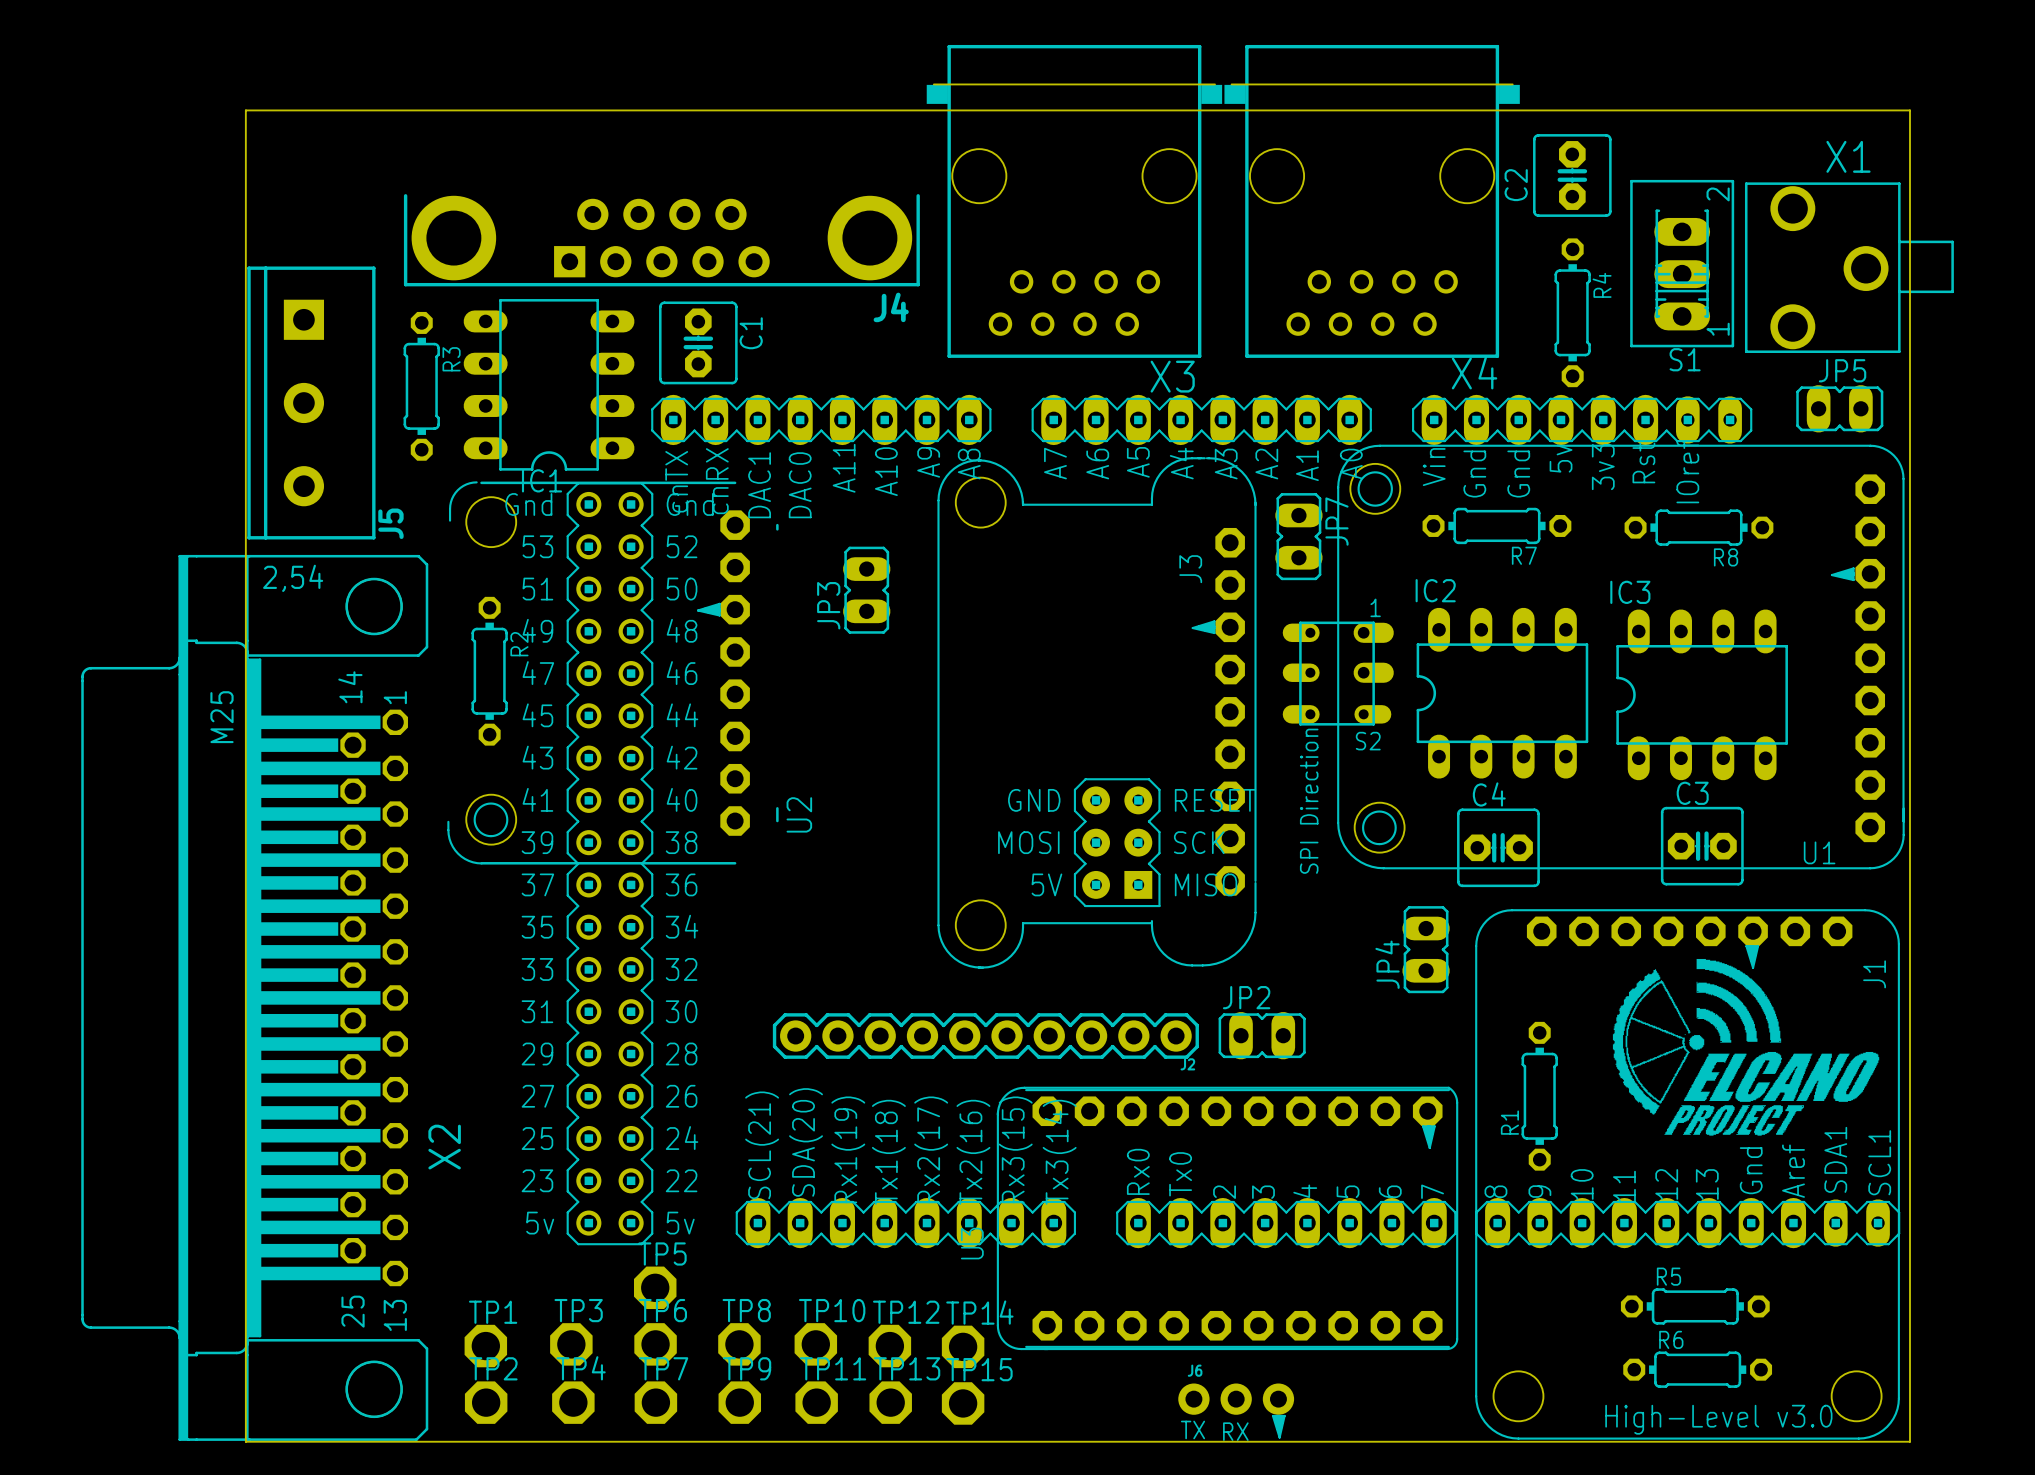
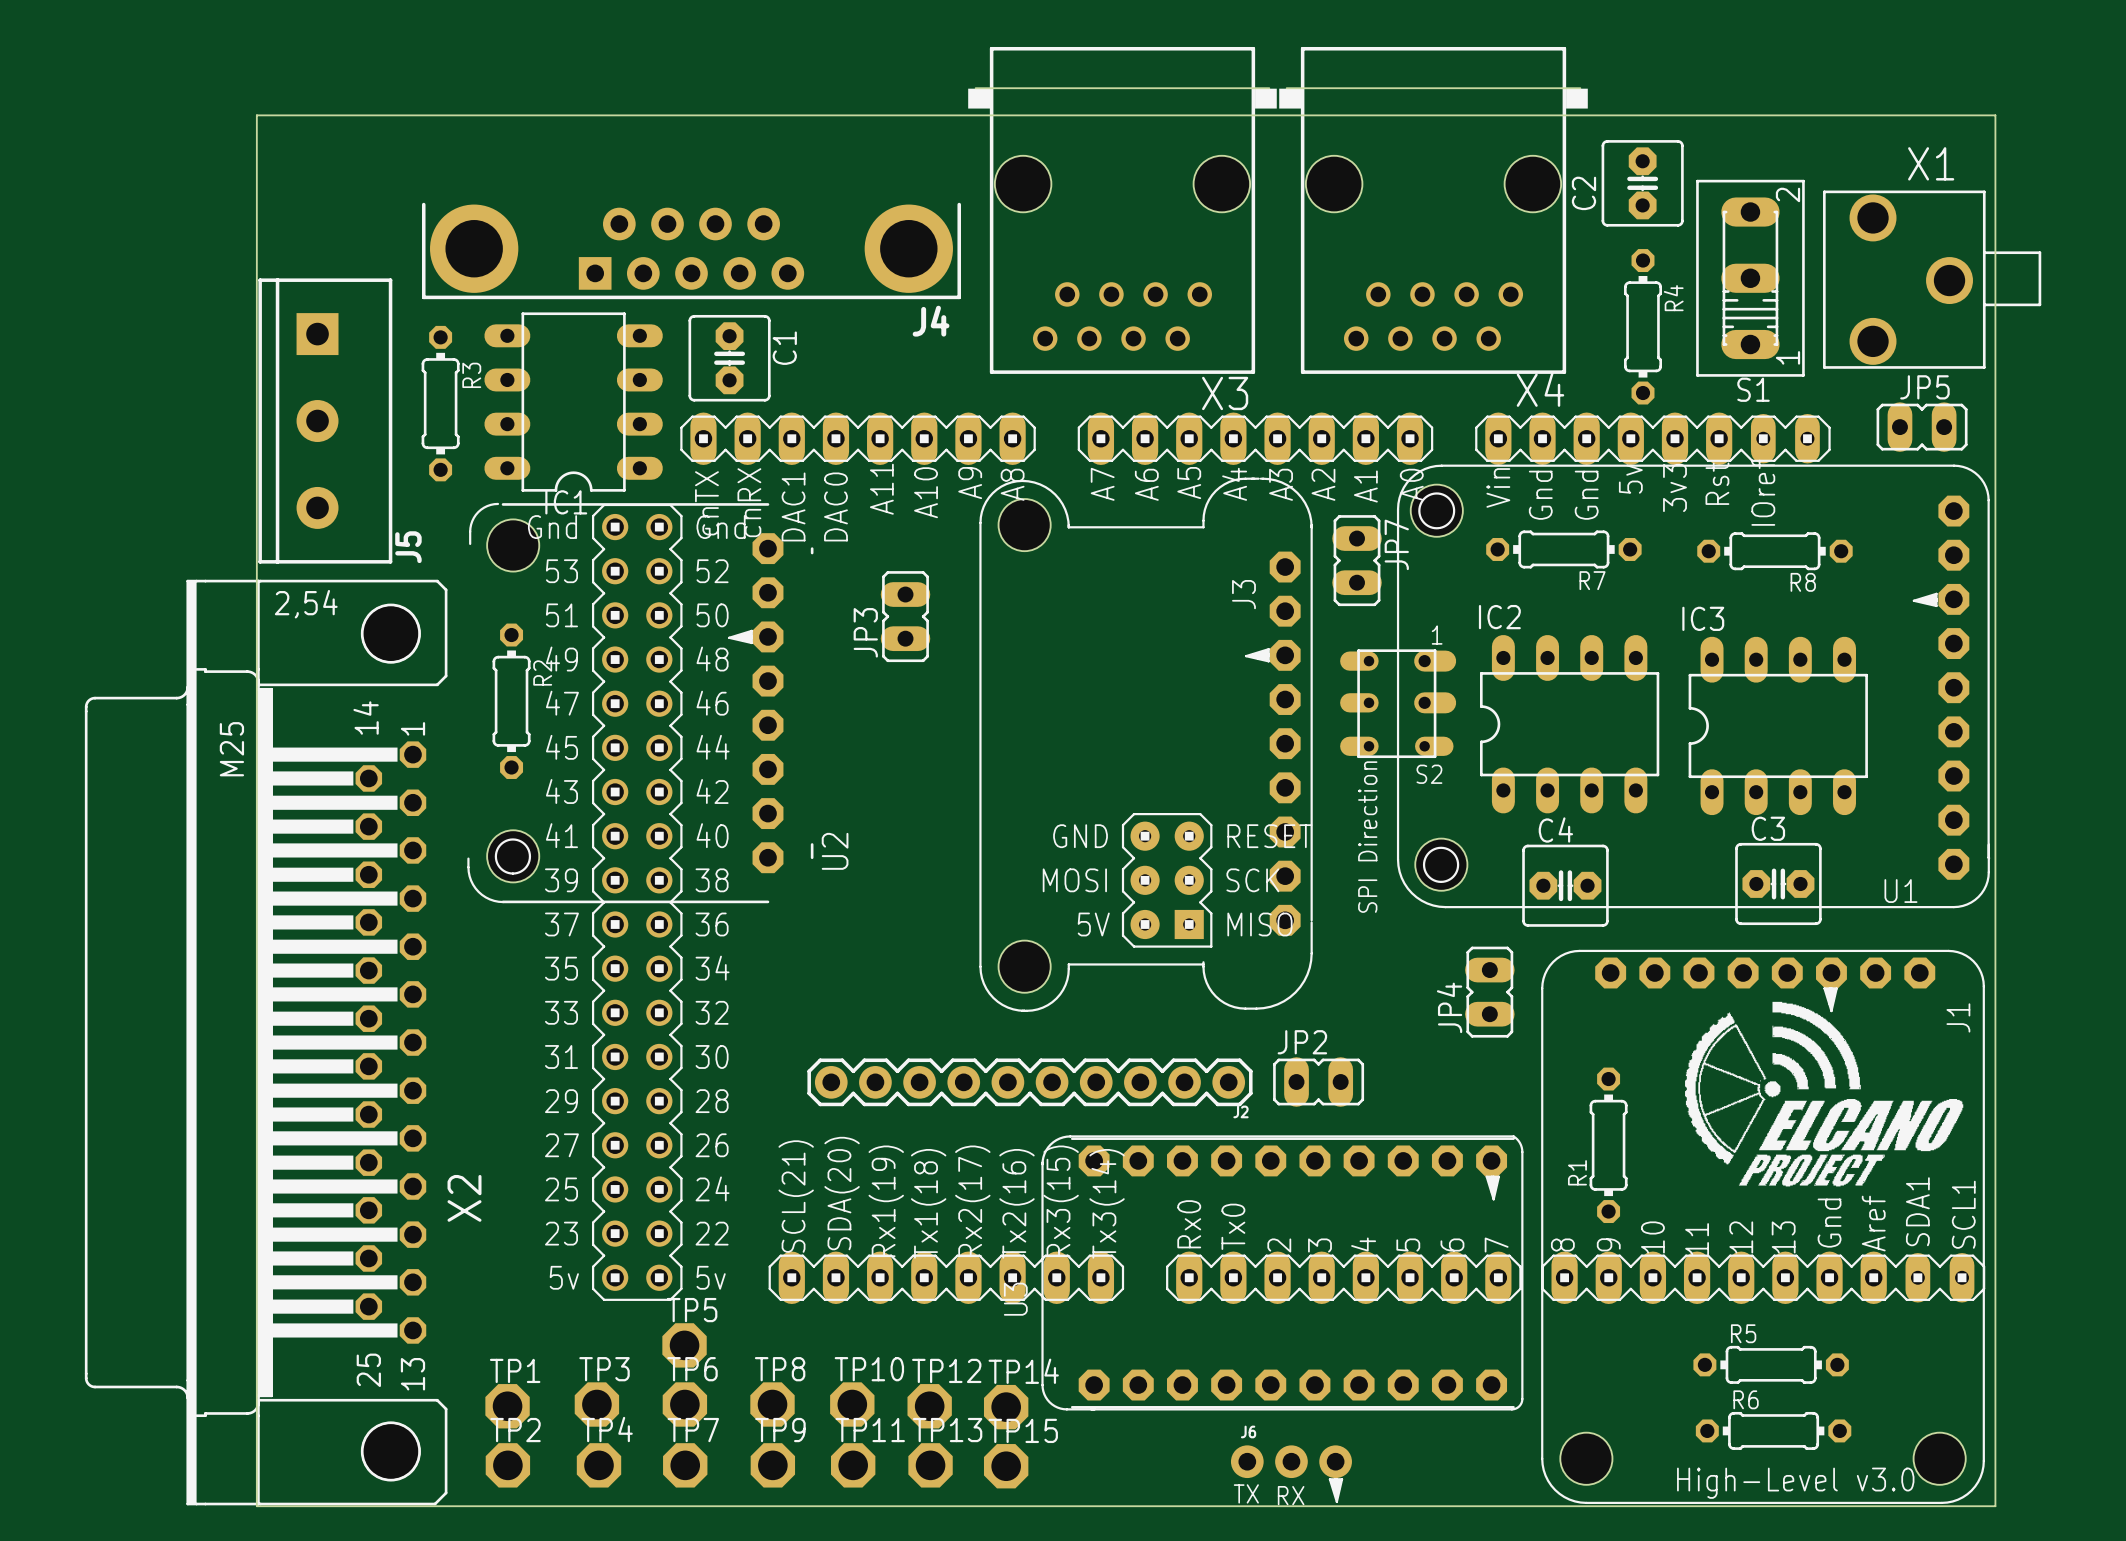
S1 footprint: [1630, 179, 1735, 348] -> [1696, 179, 1805, 377]

